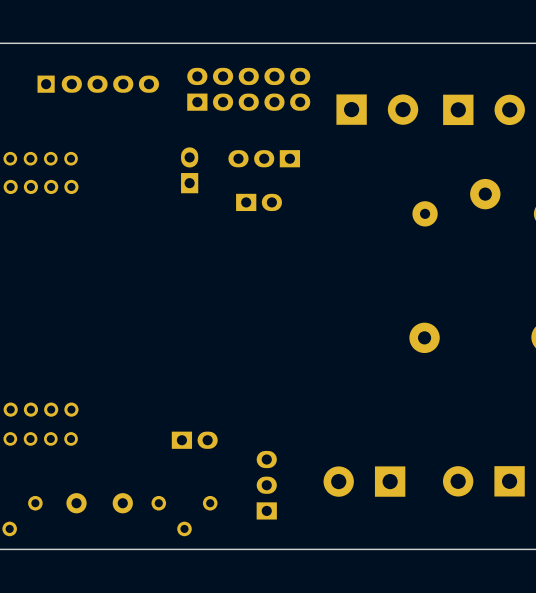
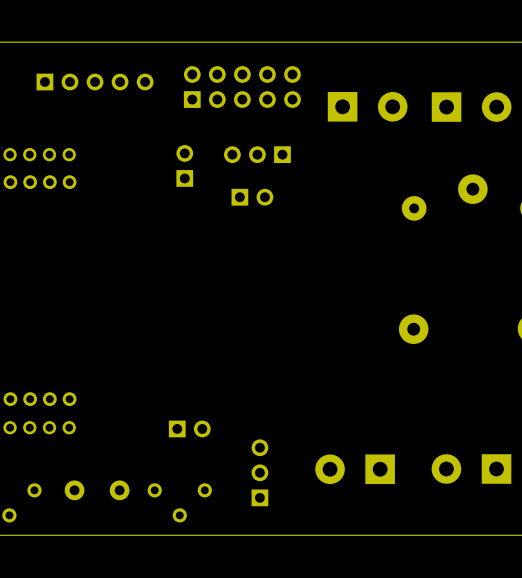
part footprint: [187, 67, 311, 111] -> [183, 66, 301, 108]
part footprint: [37, 75, 160, 93] -> [36, 73, 154, 91]
part footprint: [181, 147, 199, 194] -> [176, 145, 194, 187]
part footprint: [228, 150, 301, 168] -> [223, 146, 291, 164]
part footprint: [236, 193, 283, 212] -> [231, 188, 274, 206]
part footprint: [171, 431, 218, 449] -> [168, 420, 211, 438]
part footprint: [256, 450, 277, 520] -> [251, 439, 269, 507]

